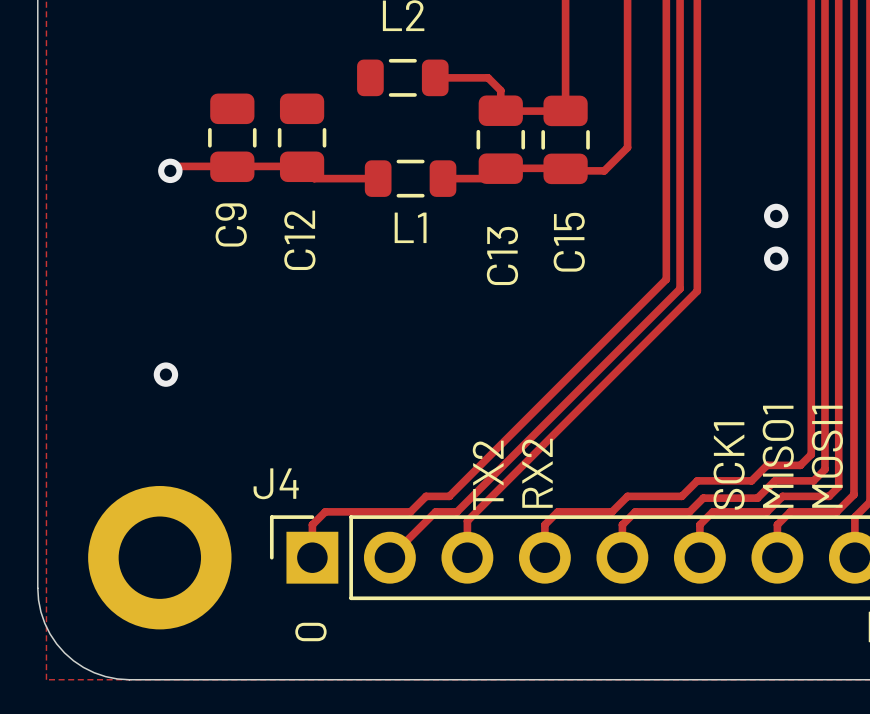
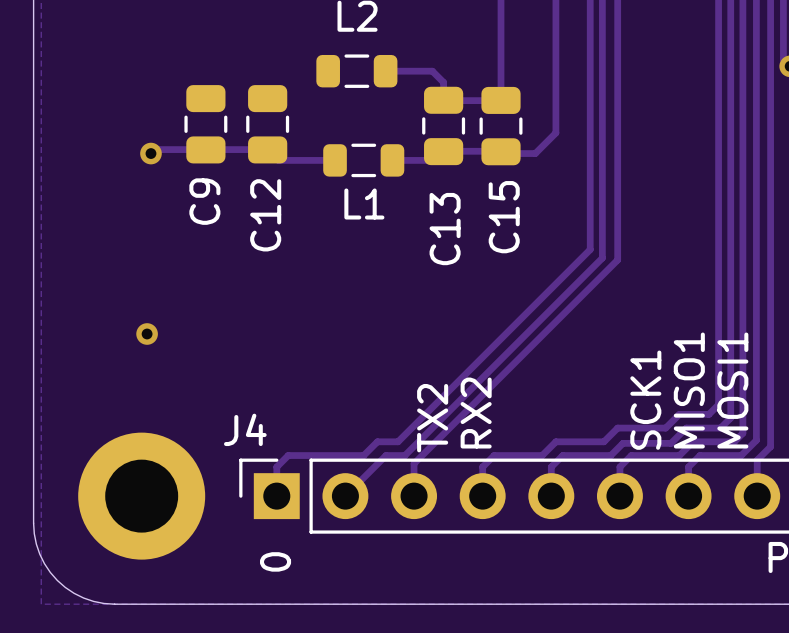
via: (776, 215) -> none
via: (776, 258) -> none

